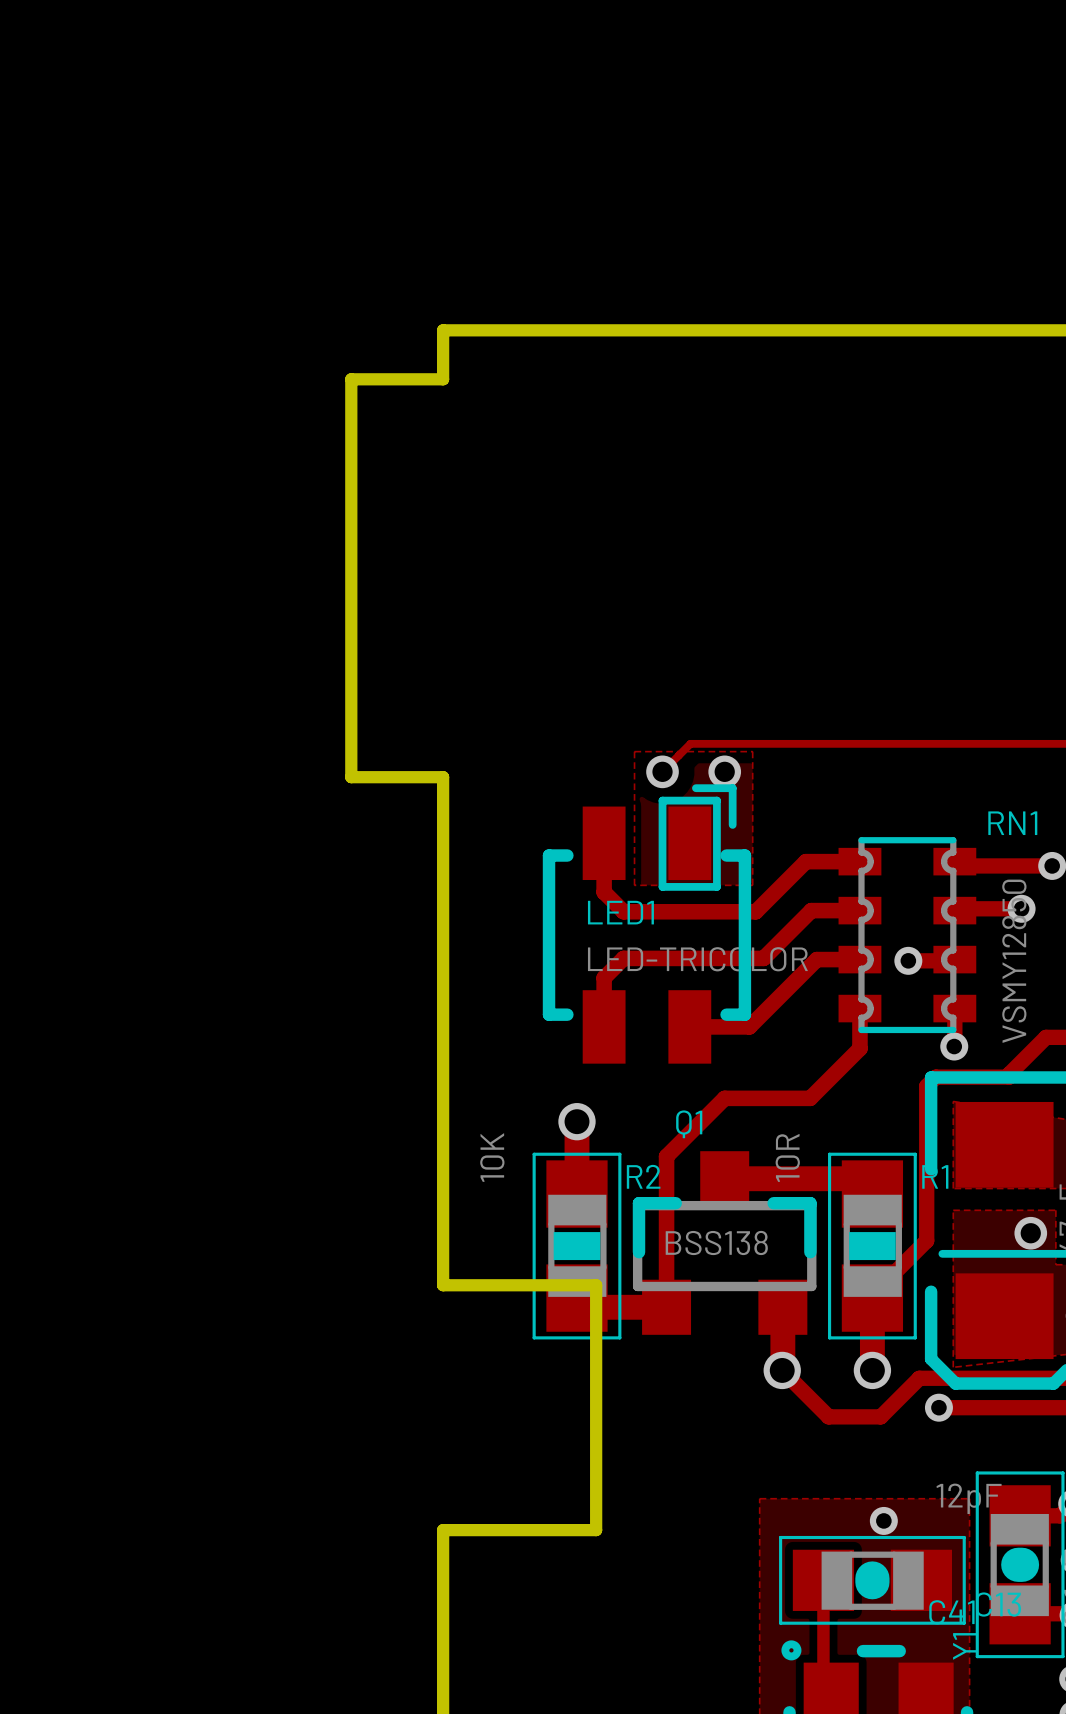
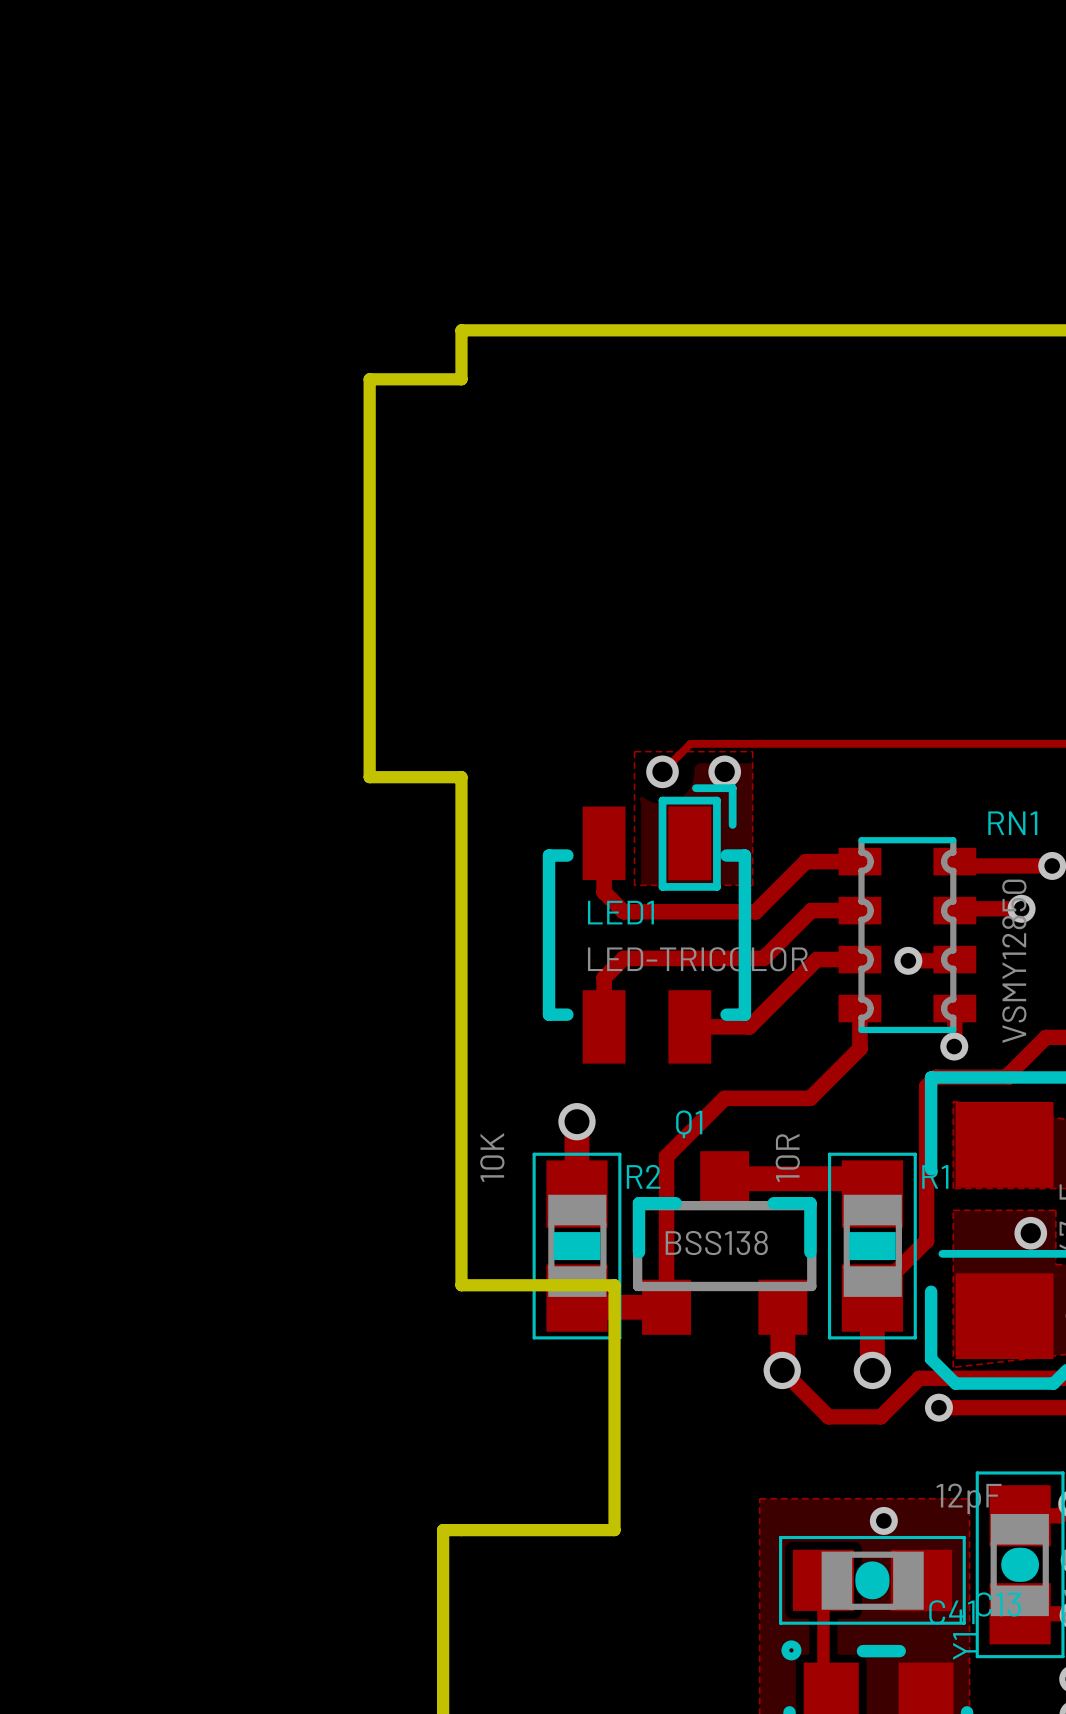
board edge: (461, 330) (443, 330) (443, 379) -> (461, 330) (461, 379) (443, 379)
board edge: (369, 379) (351, 379) (351, 777) (369, 777) -> (369, 379) (369, 777)
board edge: (443, 777) (443, 1285) (461, 1285) -> (443, 777) (461, 777) (461, 1285)
board edge: (596, 1285) (596, 1530) -> (596, 1285) (614, 1285) (614, 1530) (596, 1530)

